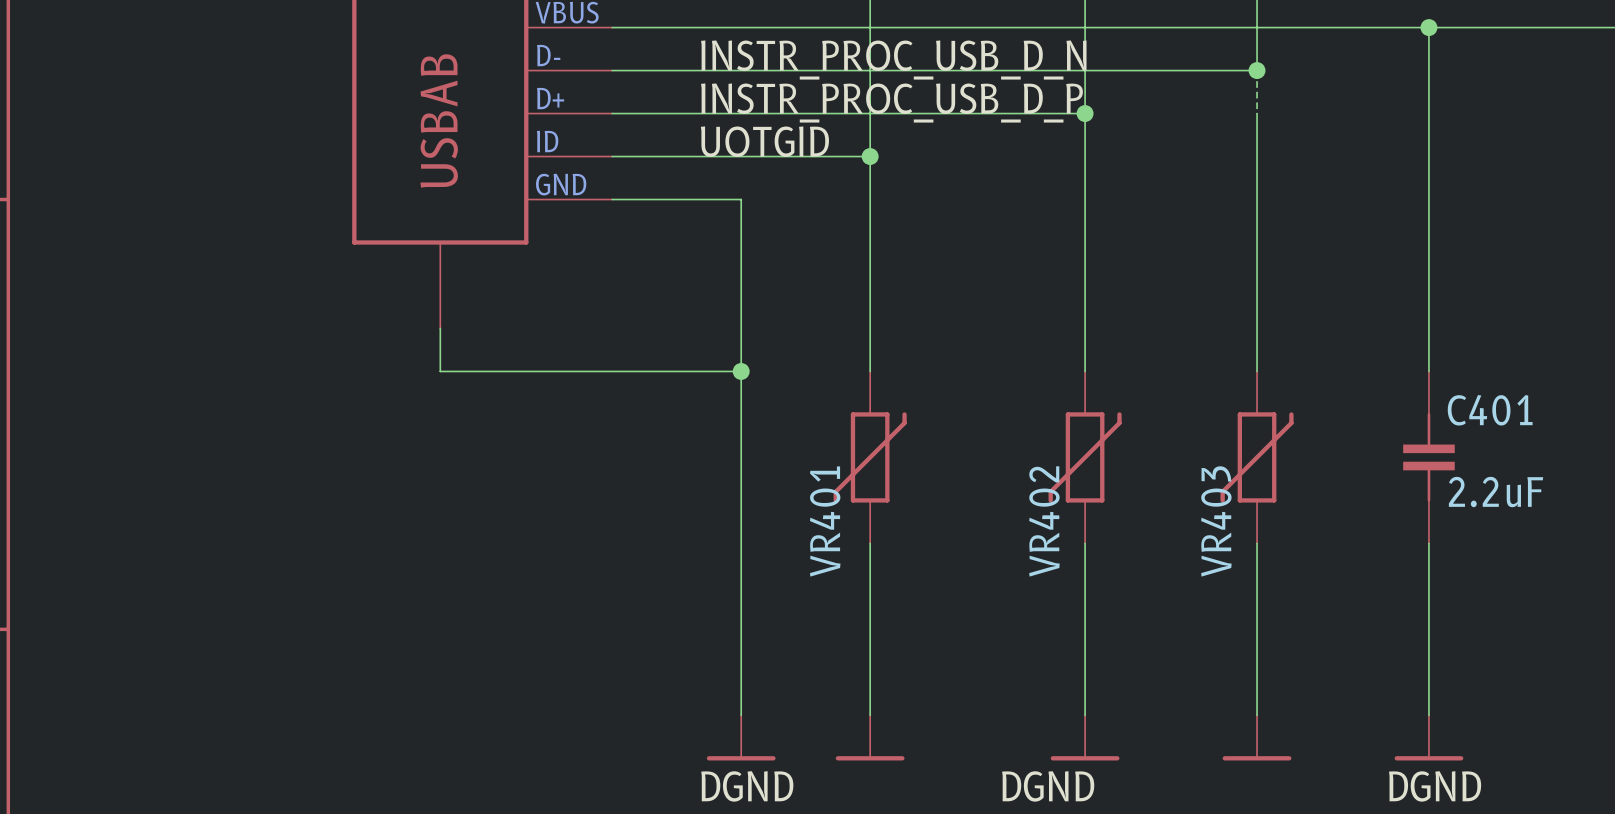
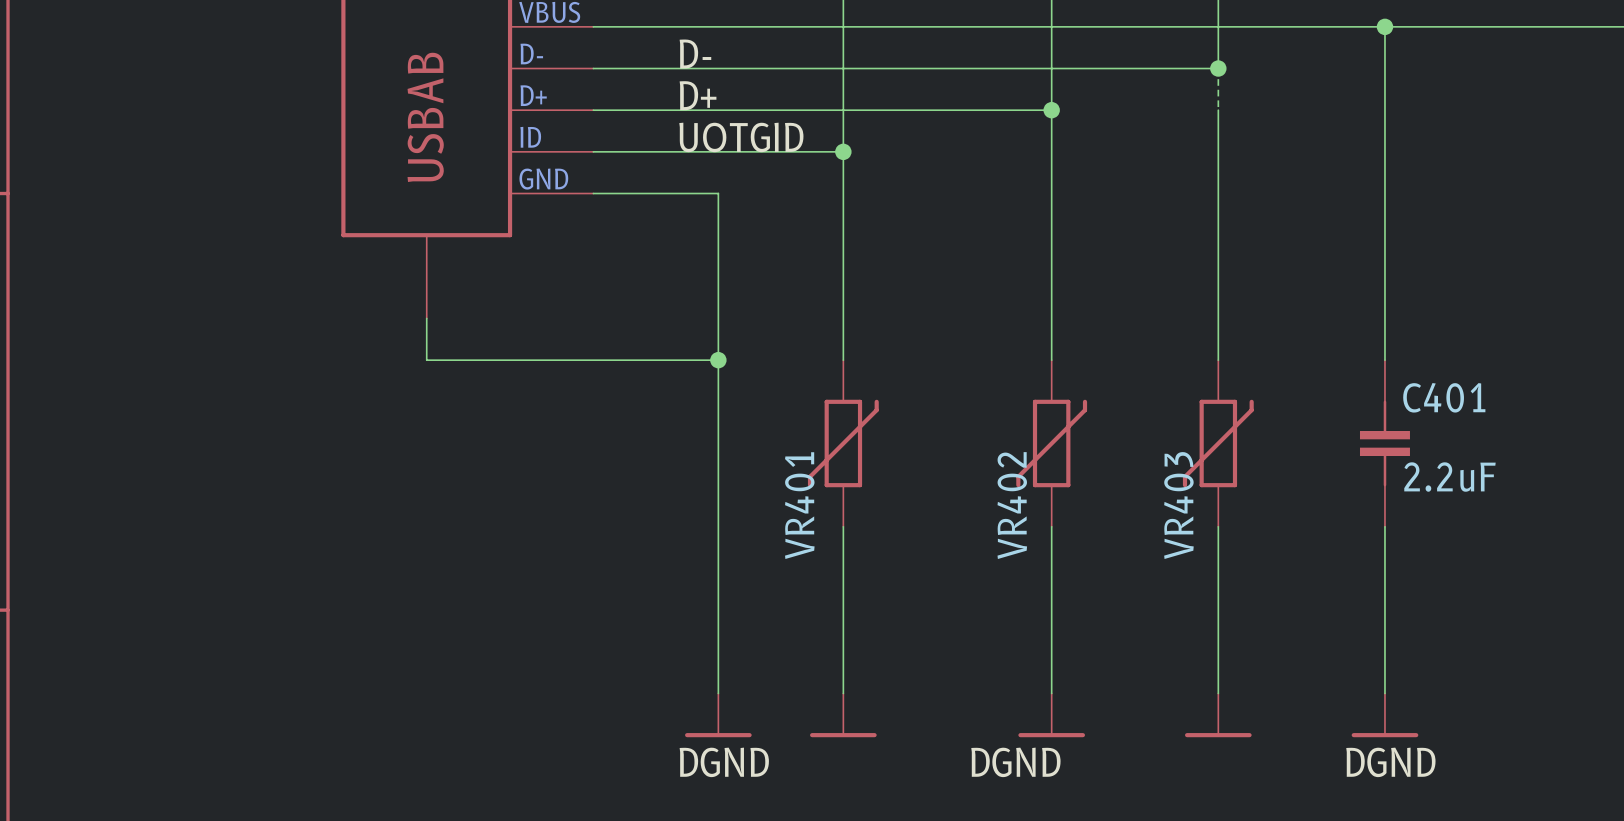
label: INSTR_PROC_USB_D_N (893, 60) -> D- (695, 54)
label: INSTR_PROC_USB_D_P (891, 103) -> D+ (698, 95)

